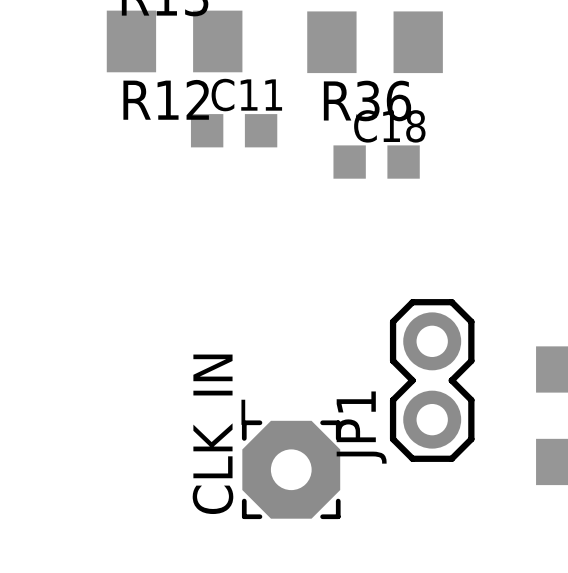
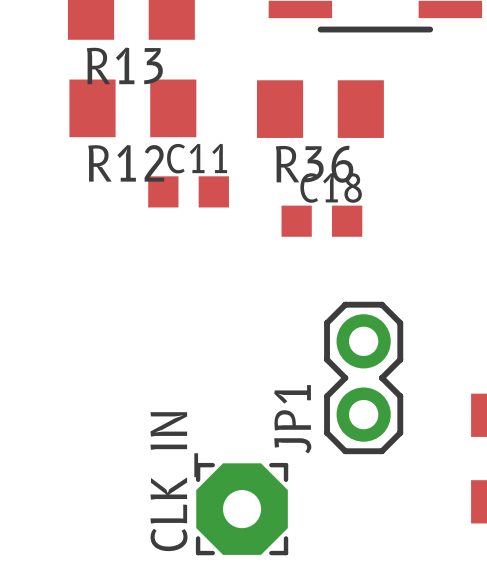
JP1 position: (432, 380) -> (363, 377)

